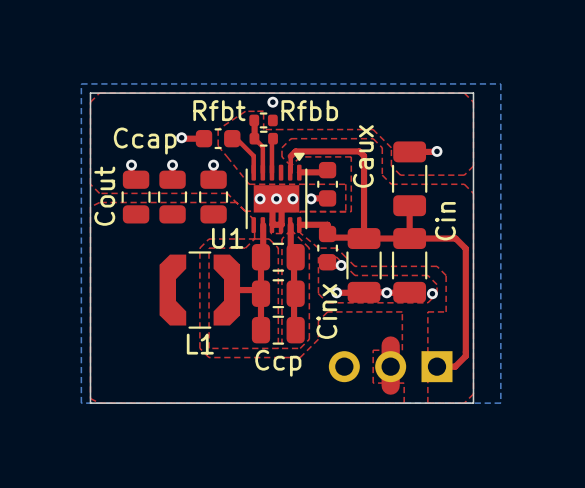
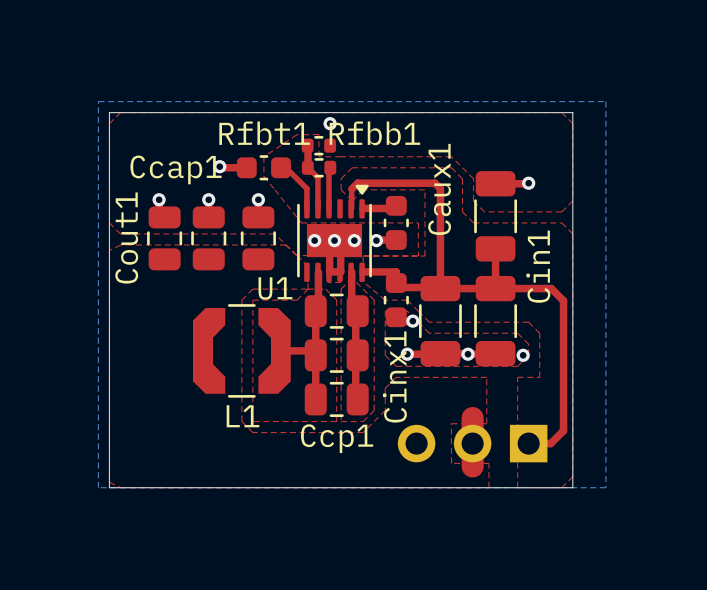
Rfbt name: Rfbt (219, 110) -> Rfbt1 (264, 133)
Rfbb name: Rfbb (309, 110) -> Rfbb1 (374, 133)
Ccap name: Ccap (145, 141) -> Ccap1 (176, 169)
Caux name: Caux (363, 156) -> Caux1 (439, 189)
Cout name: Cout (104, 196) -> Cout1 (126, 238)
Cin name: Cin (445, 221) -> Cin1 (538, 266)
Cinx name: Cinx (326, 311) -> Cinx1 (394, 377)
Ccp name: Ccp (278, 363) -> Ccp1 (337, 438)

